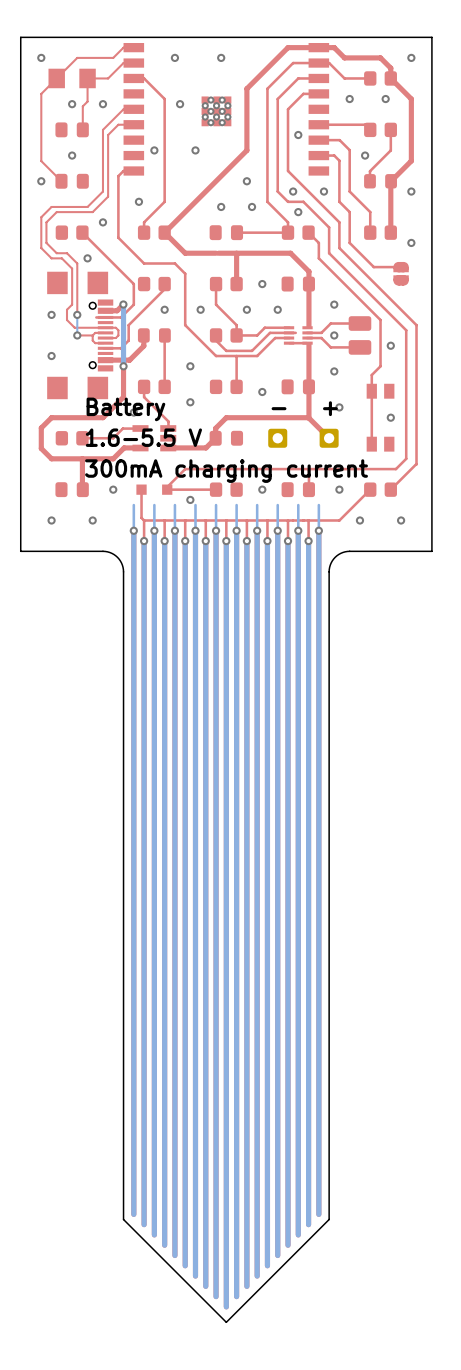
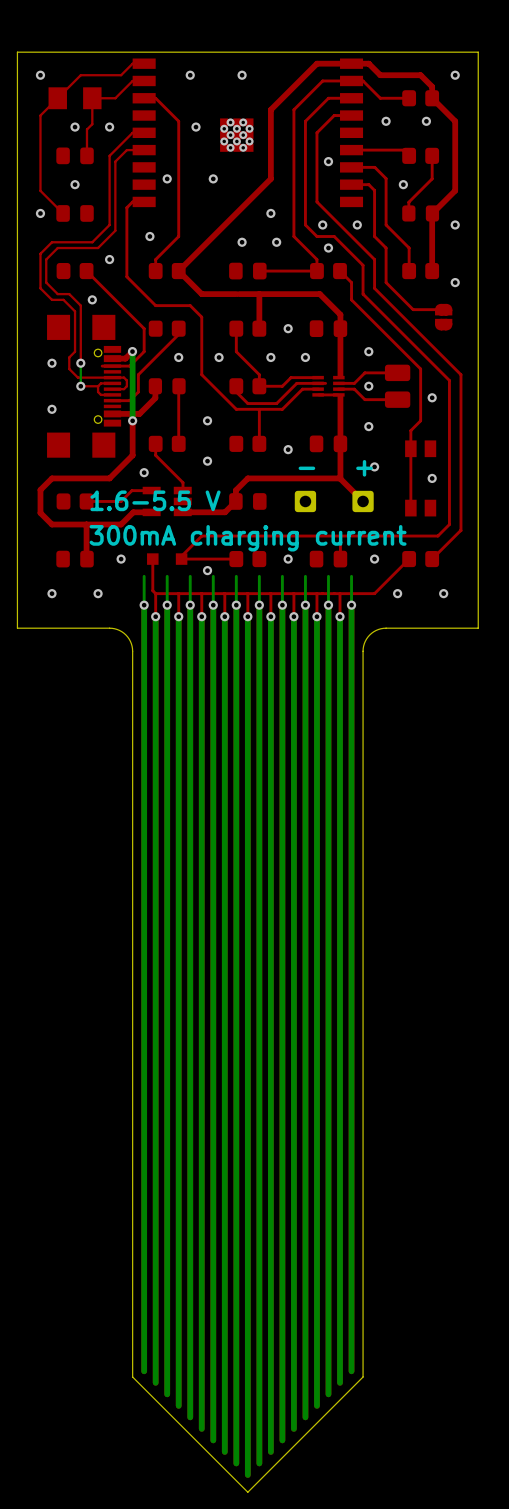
text: Battery (125, 409) -> none

